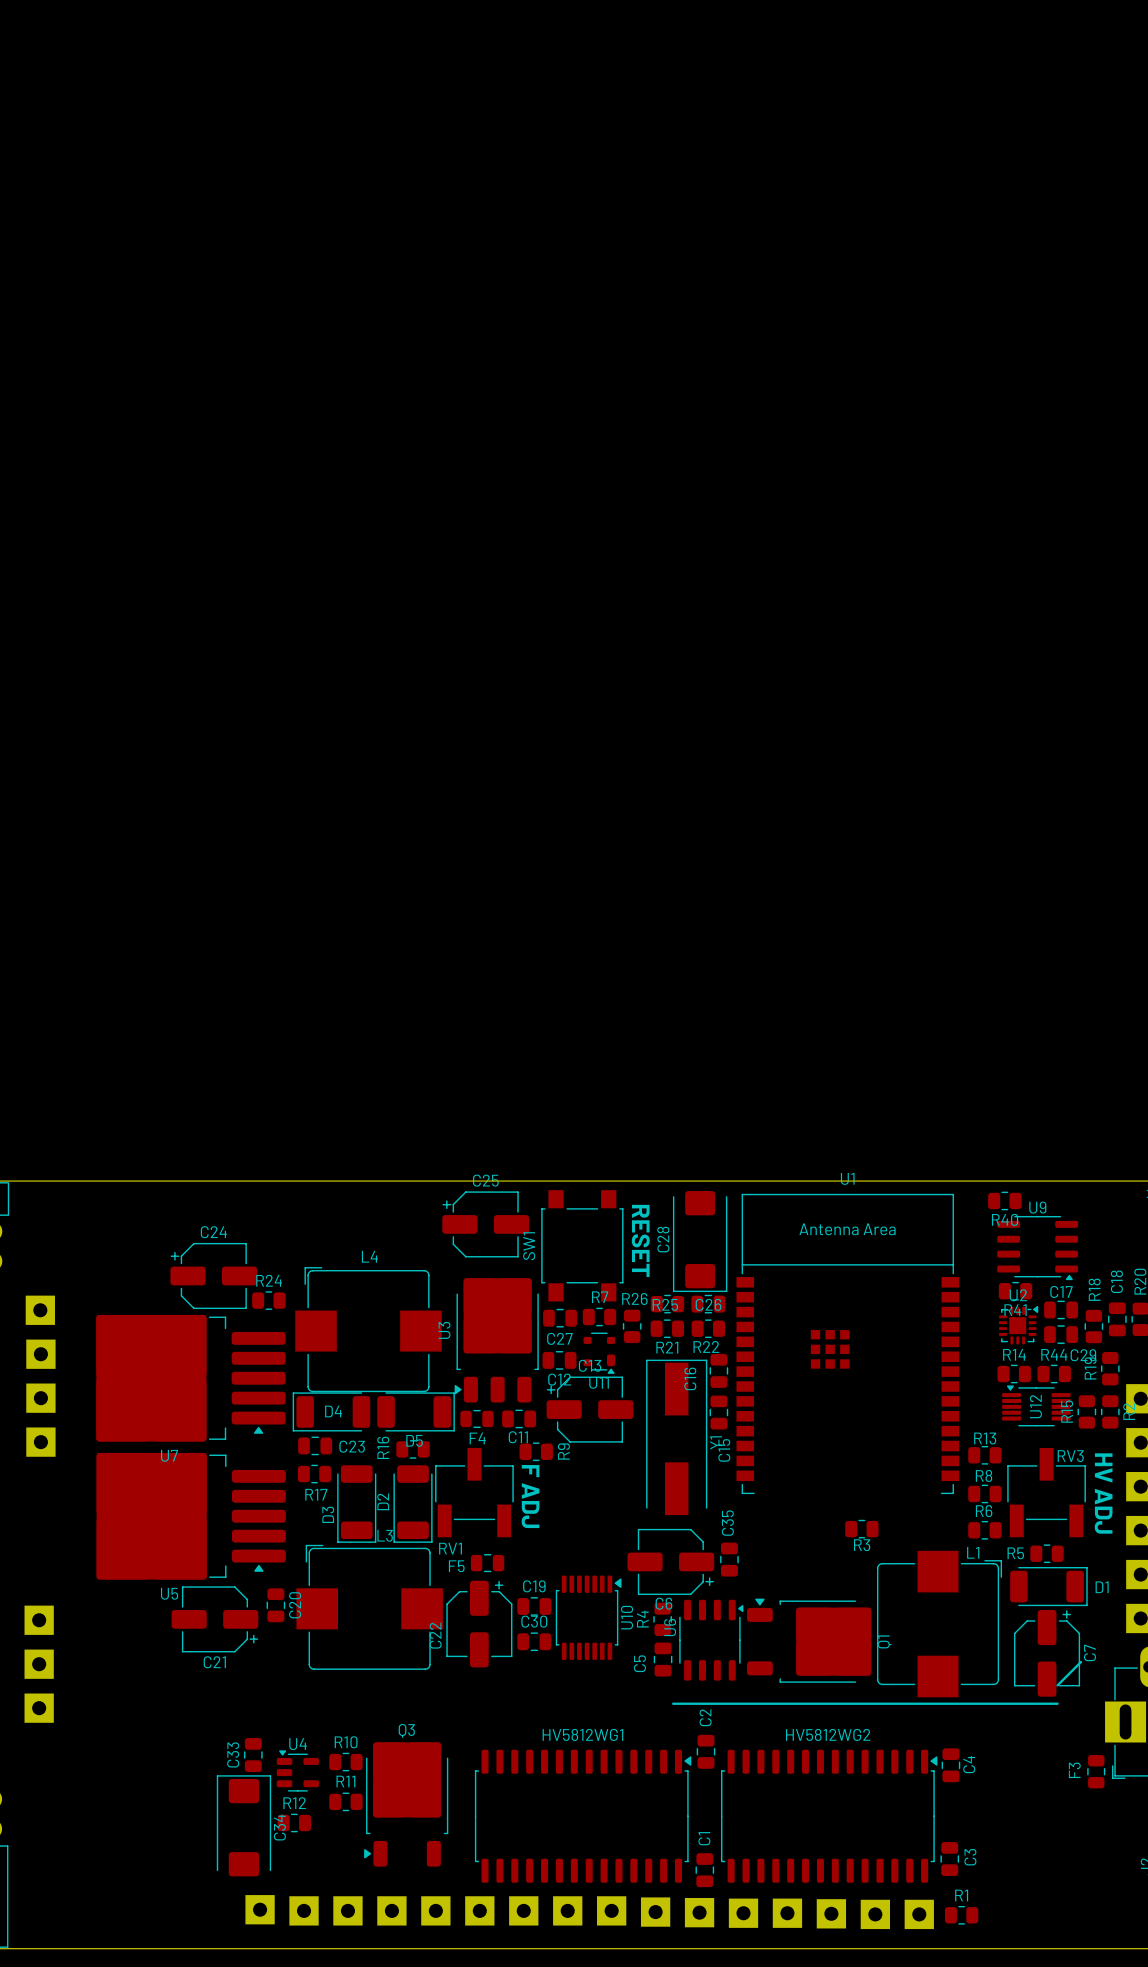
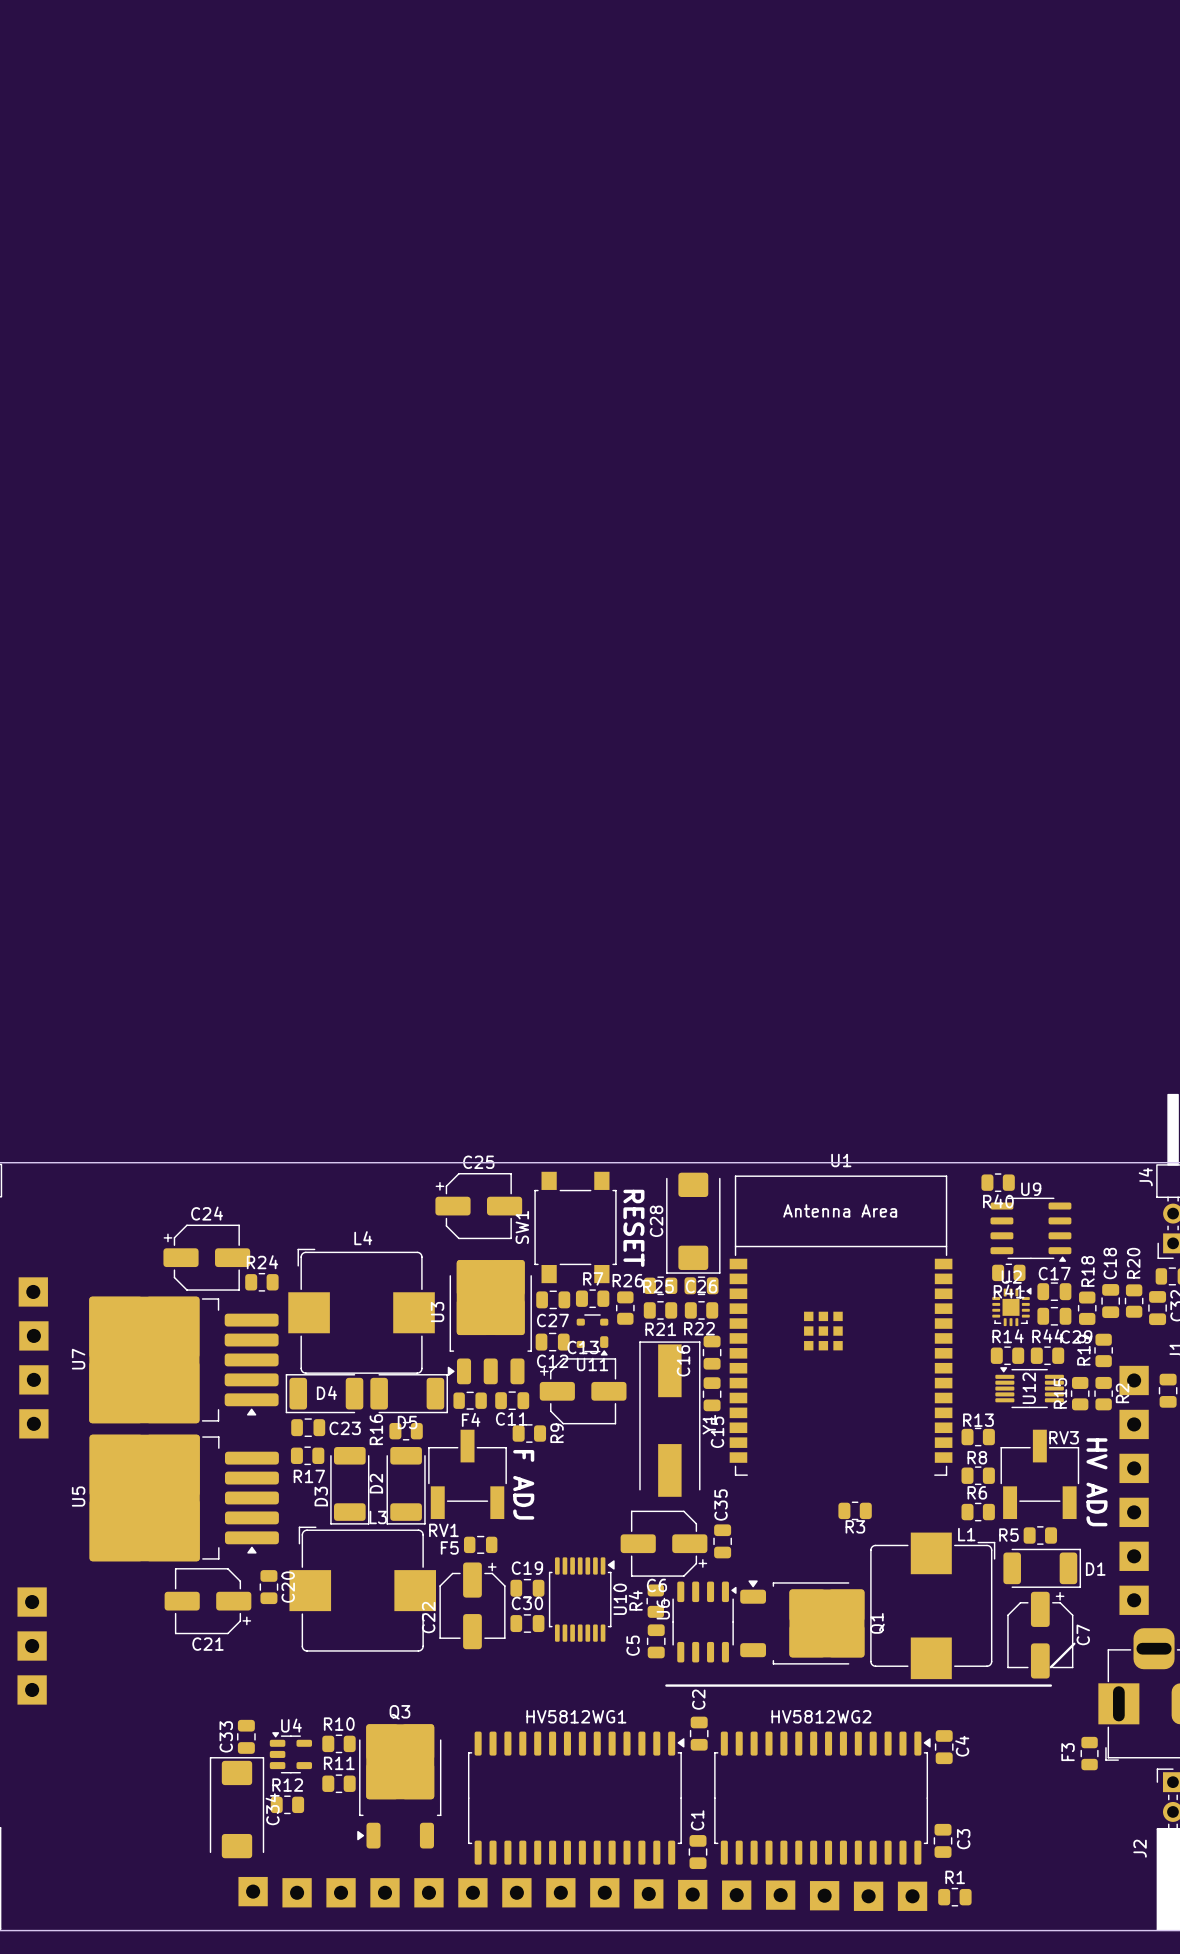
U7 name rotation: 0° (169, 1455) -> 90° counterclockwise (78, 1359)
U7 name position: U7 (169, 1455) -> U7 (78, 1359)
U5 name rotation: 0° (169, 1593) -> 90° counterclockwise (78, 1496)
U5 name position: U5 (169, 1593) -> U5 (78, 1496)

